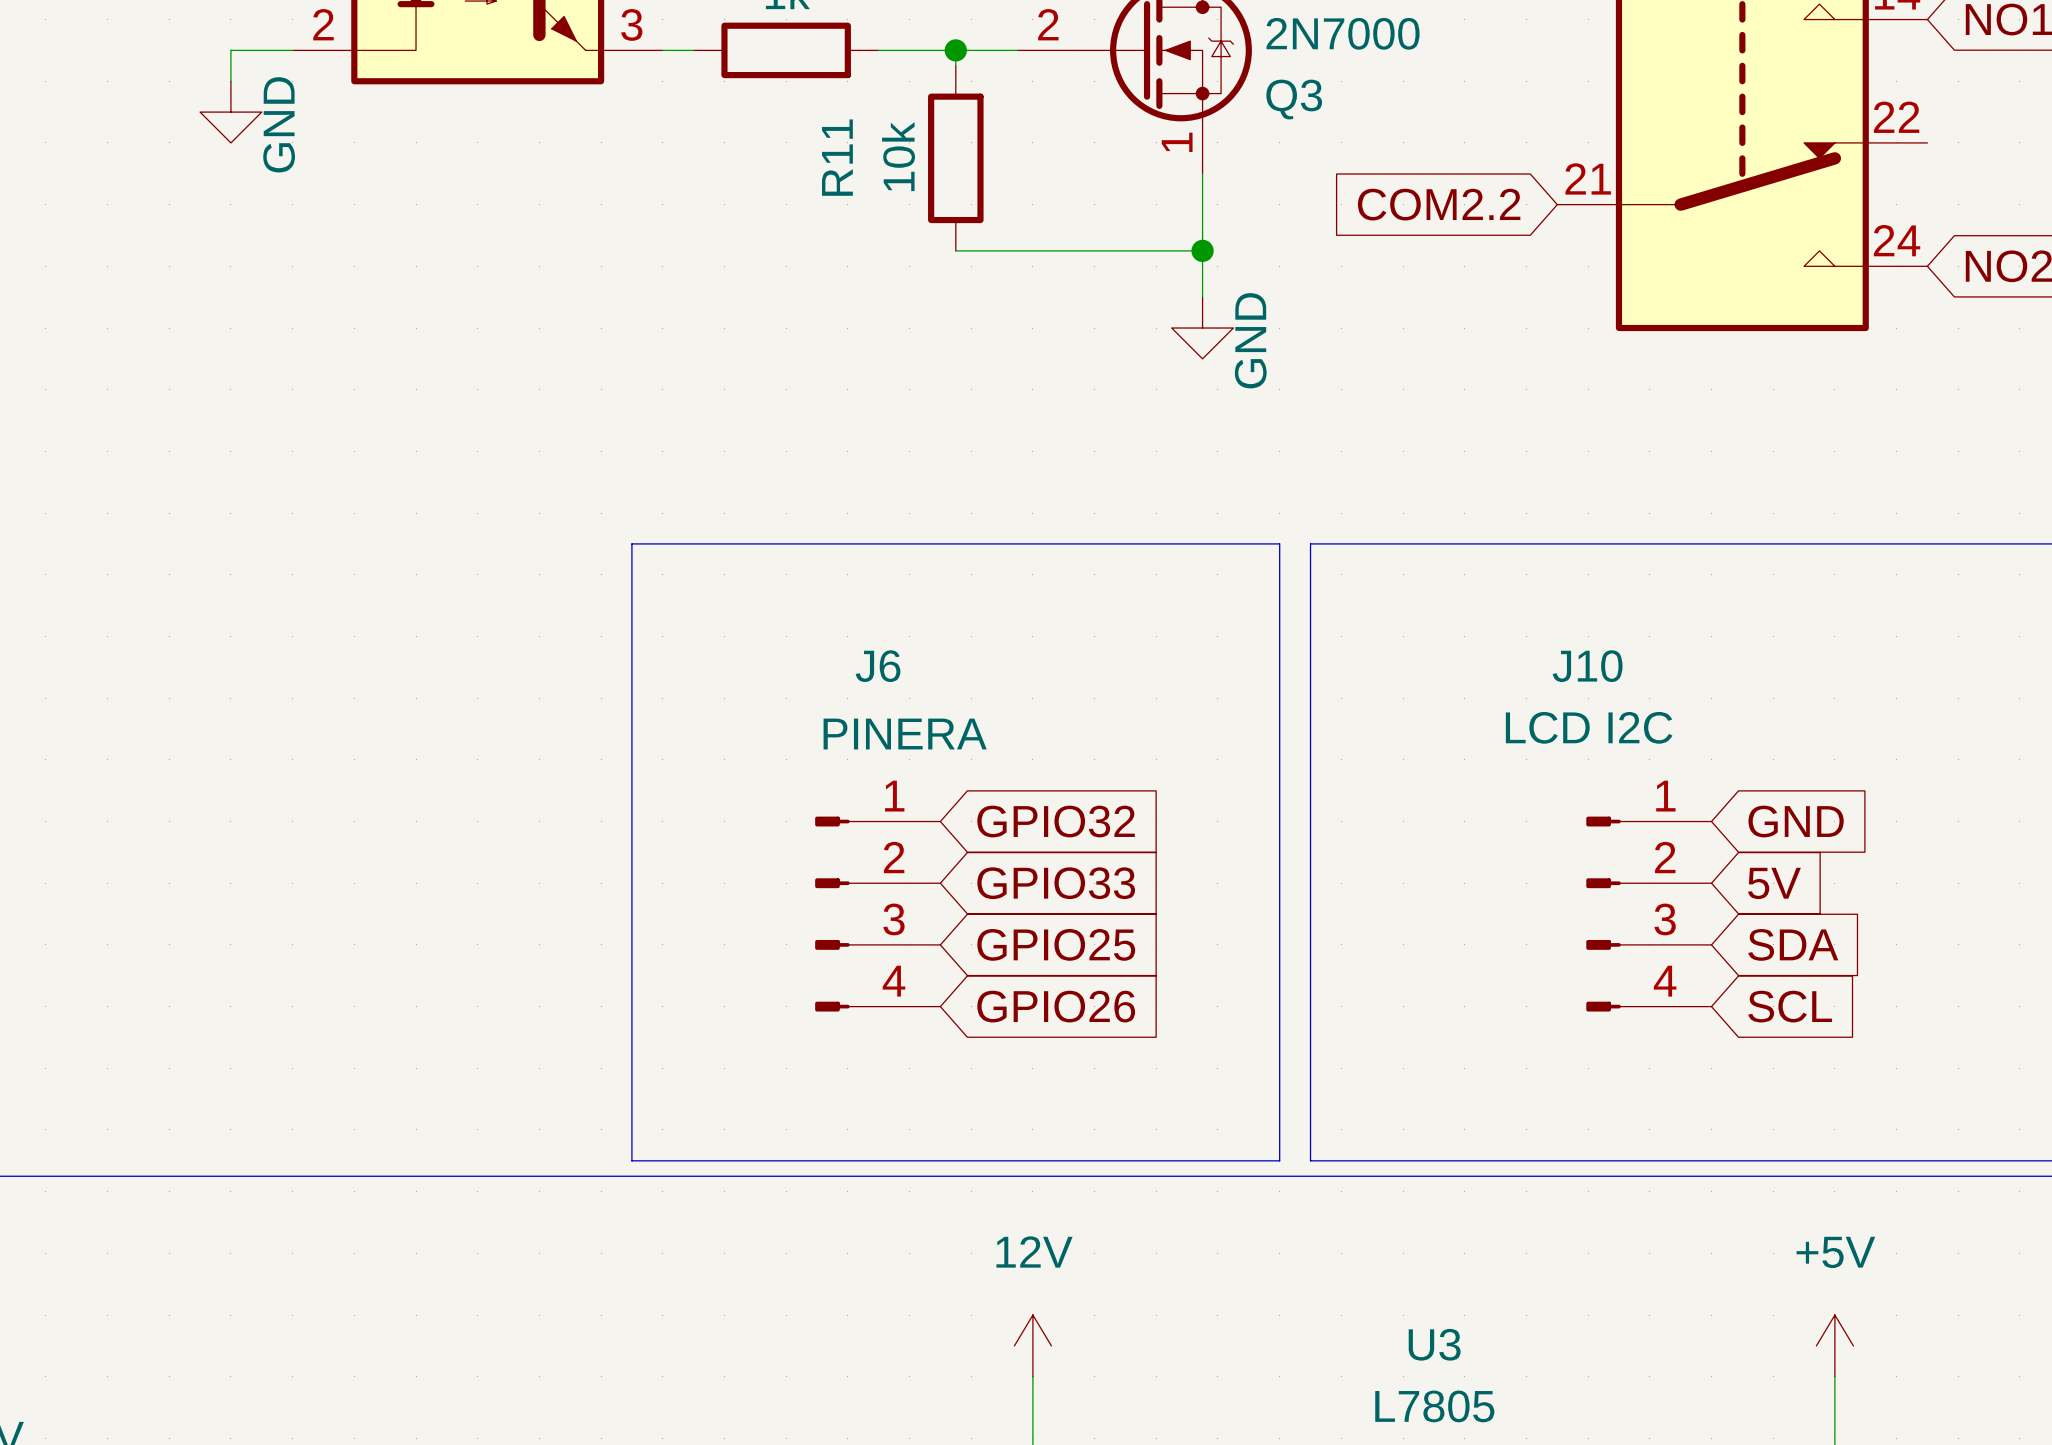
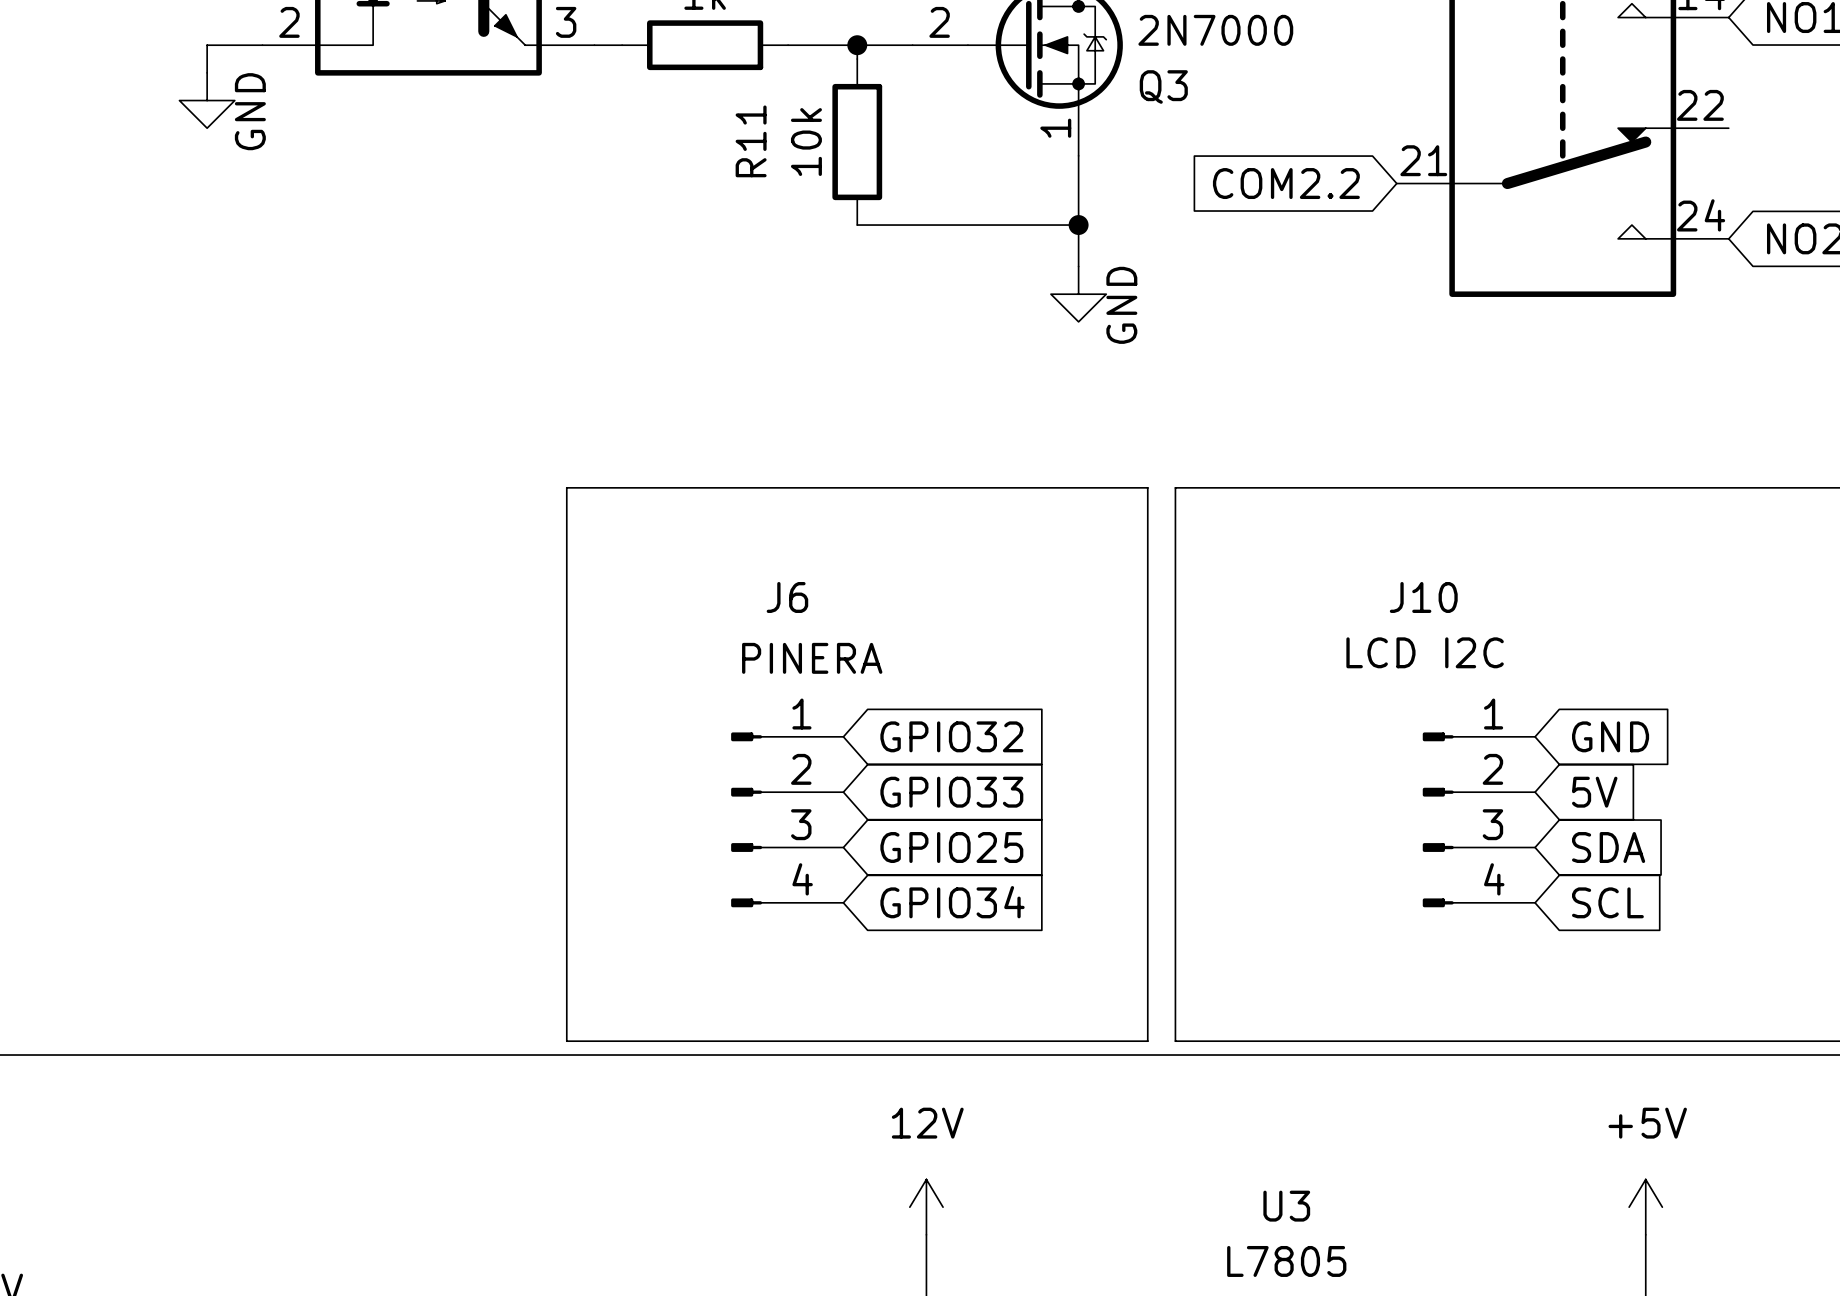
global label: GPIO26 (1056, 1006) -> GPIO34 (952, 902)

